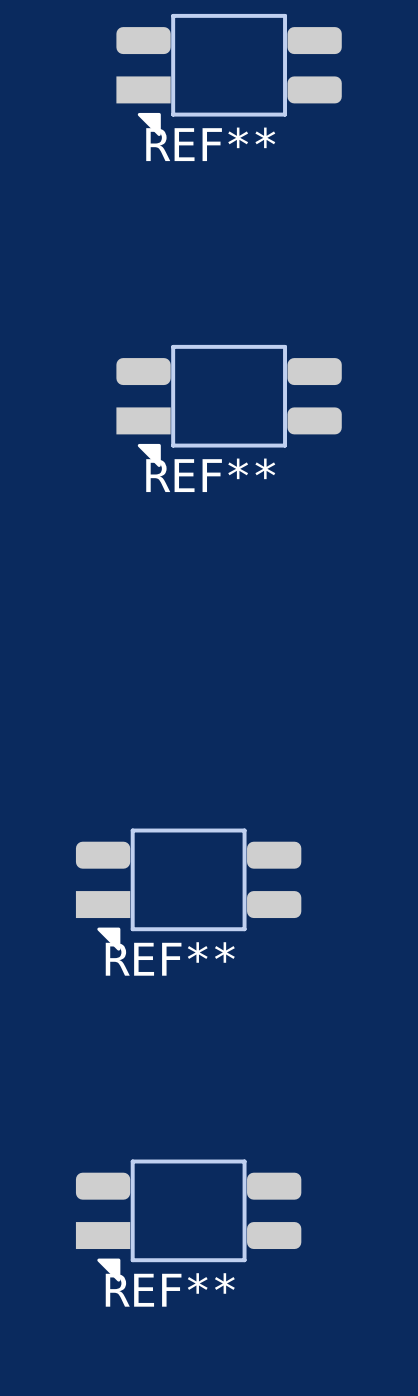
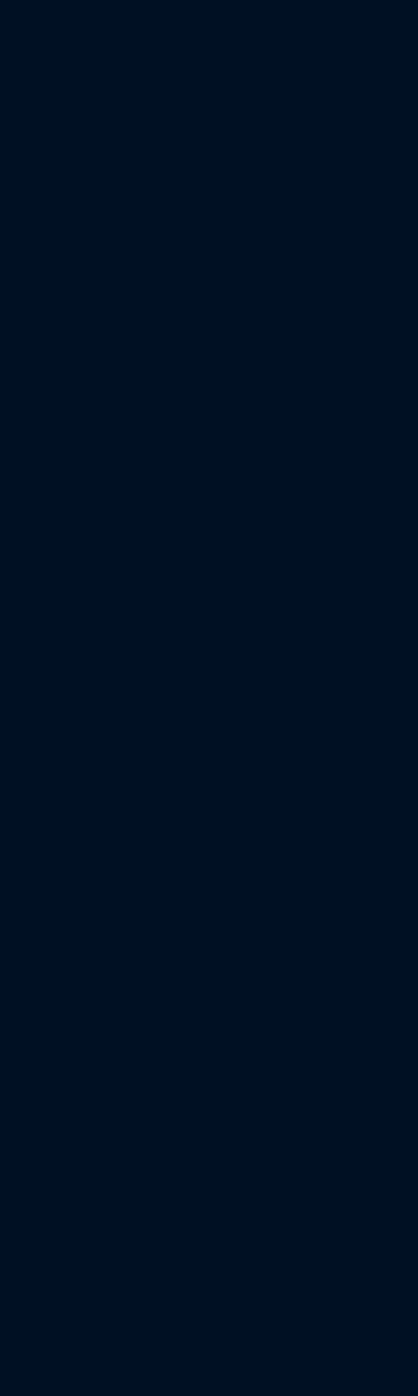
part: (229, 74) -> none
part: (229, 405) -> none
part: (188, 889) -> none
part: (188, 1220) -> none

